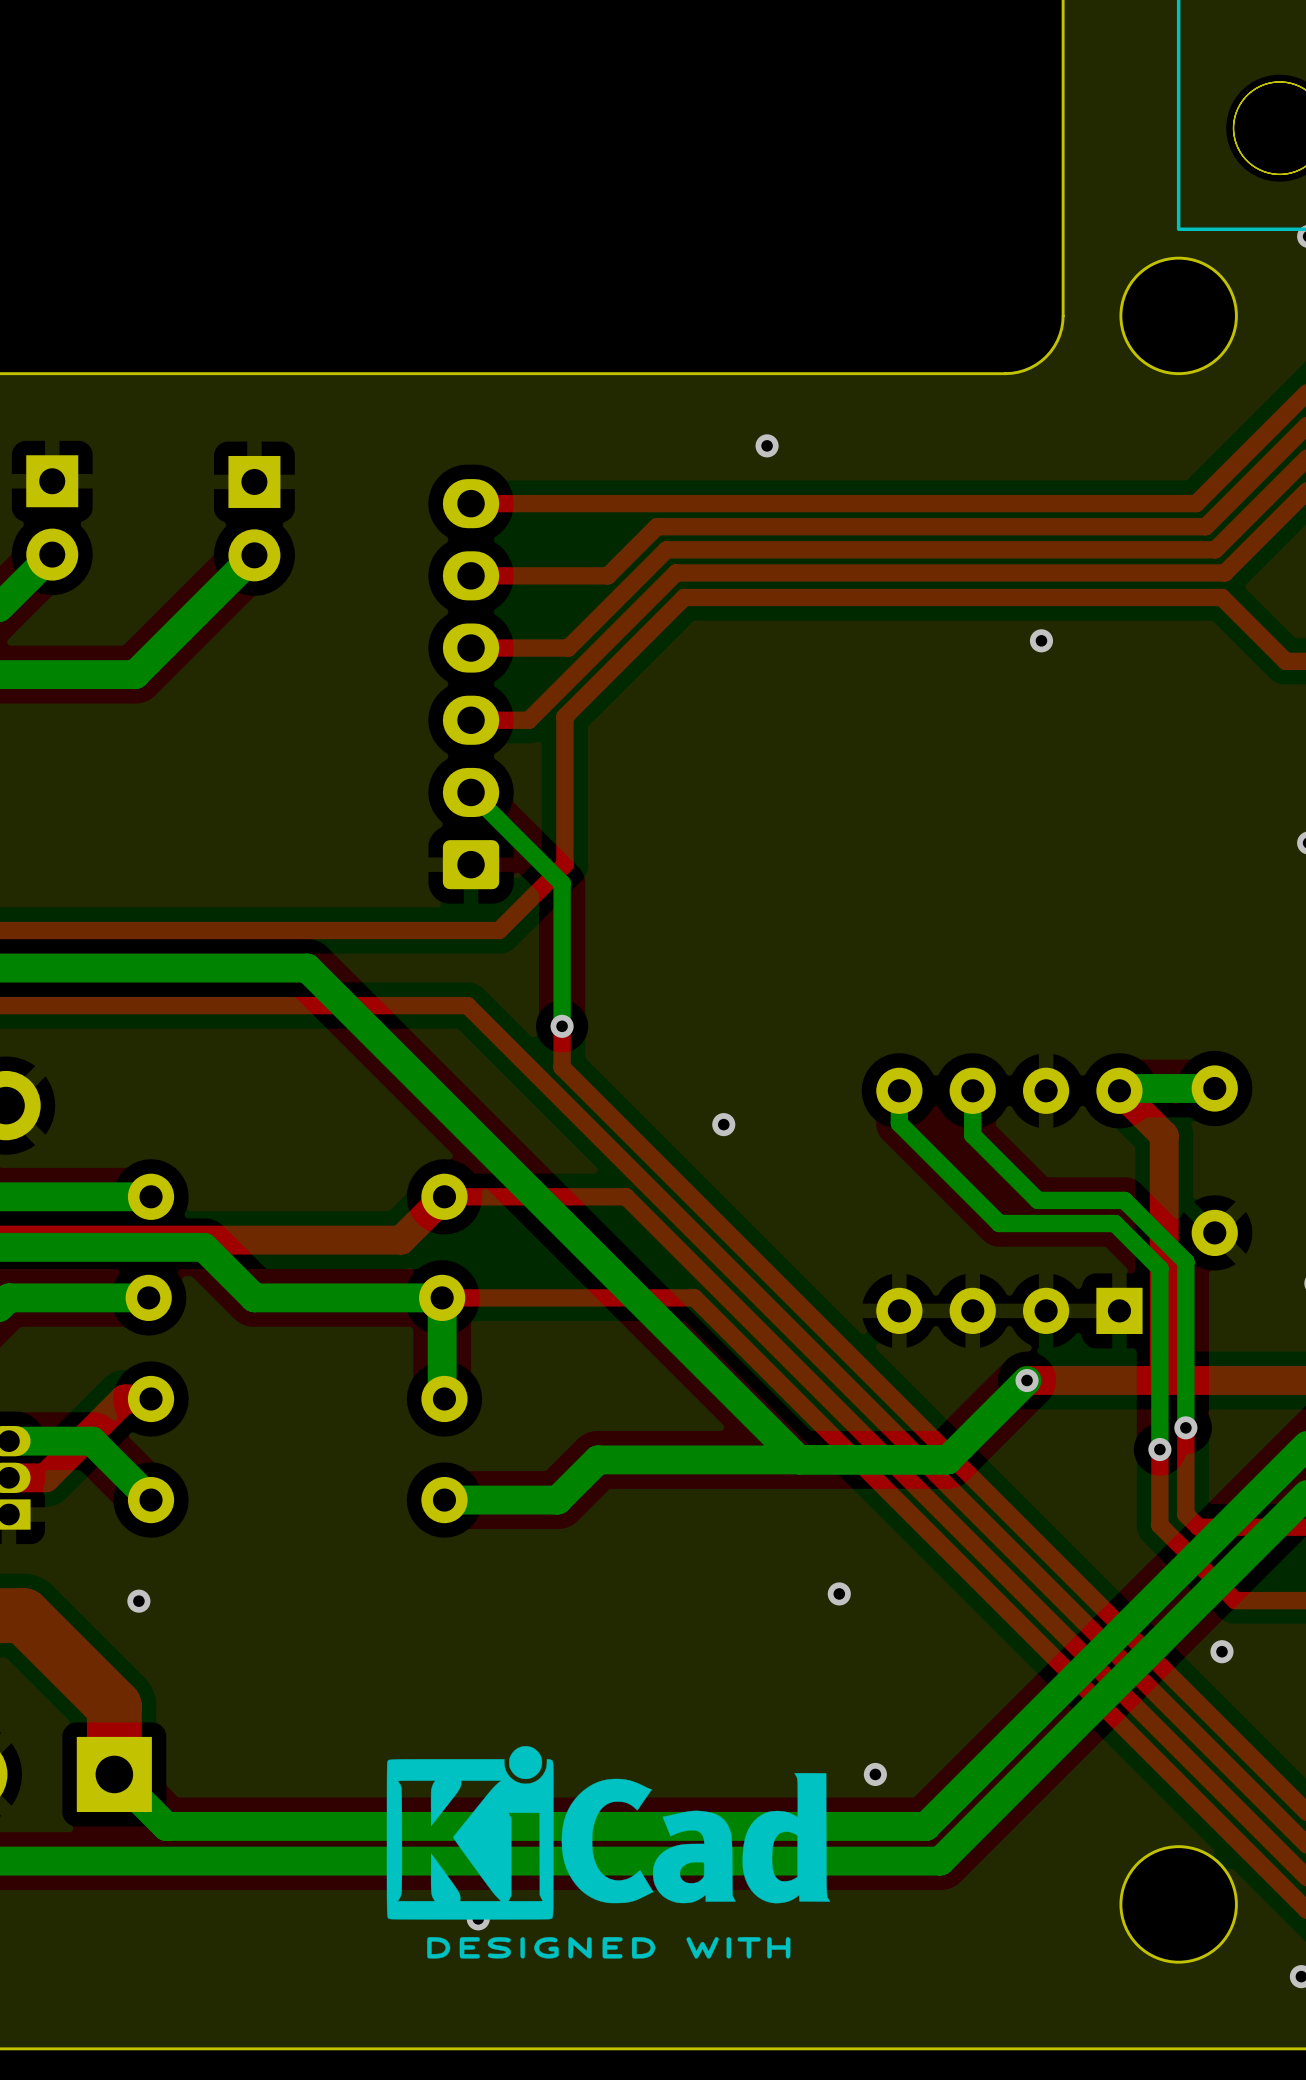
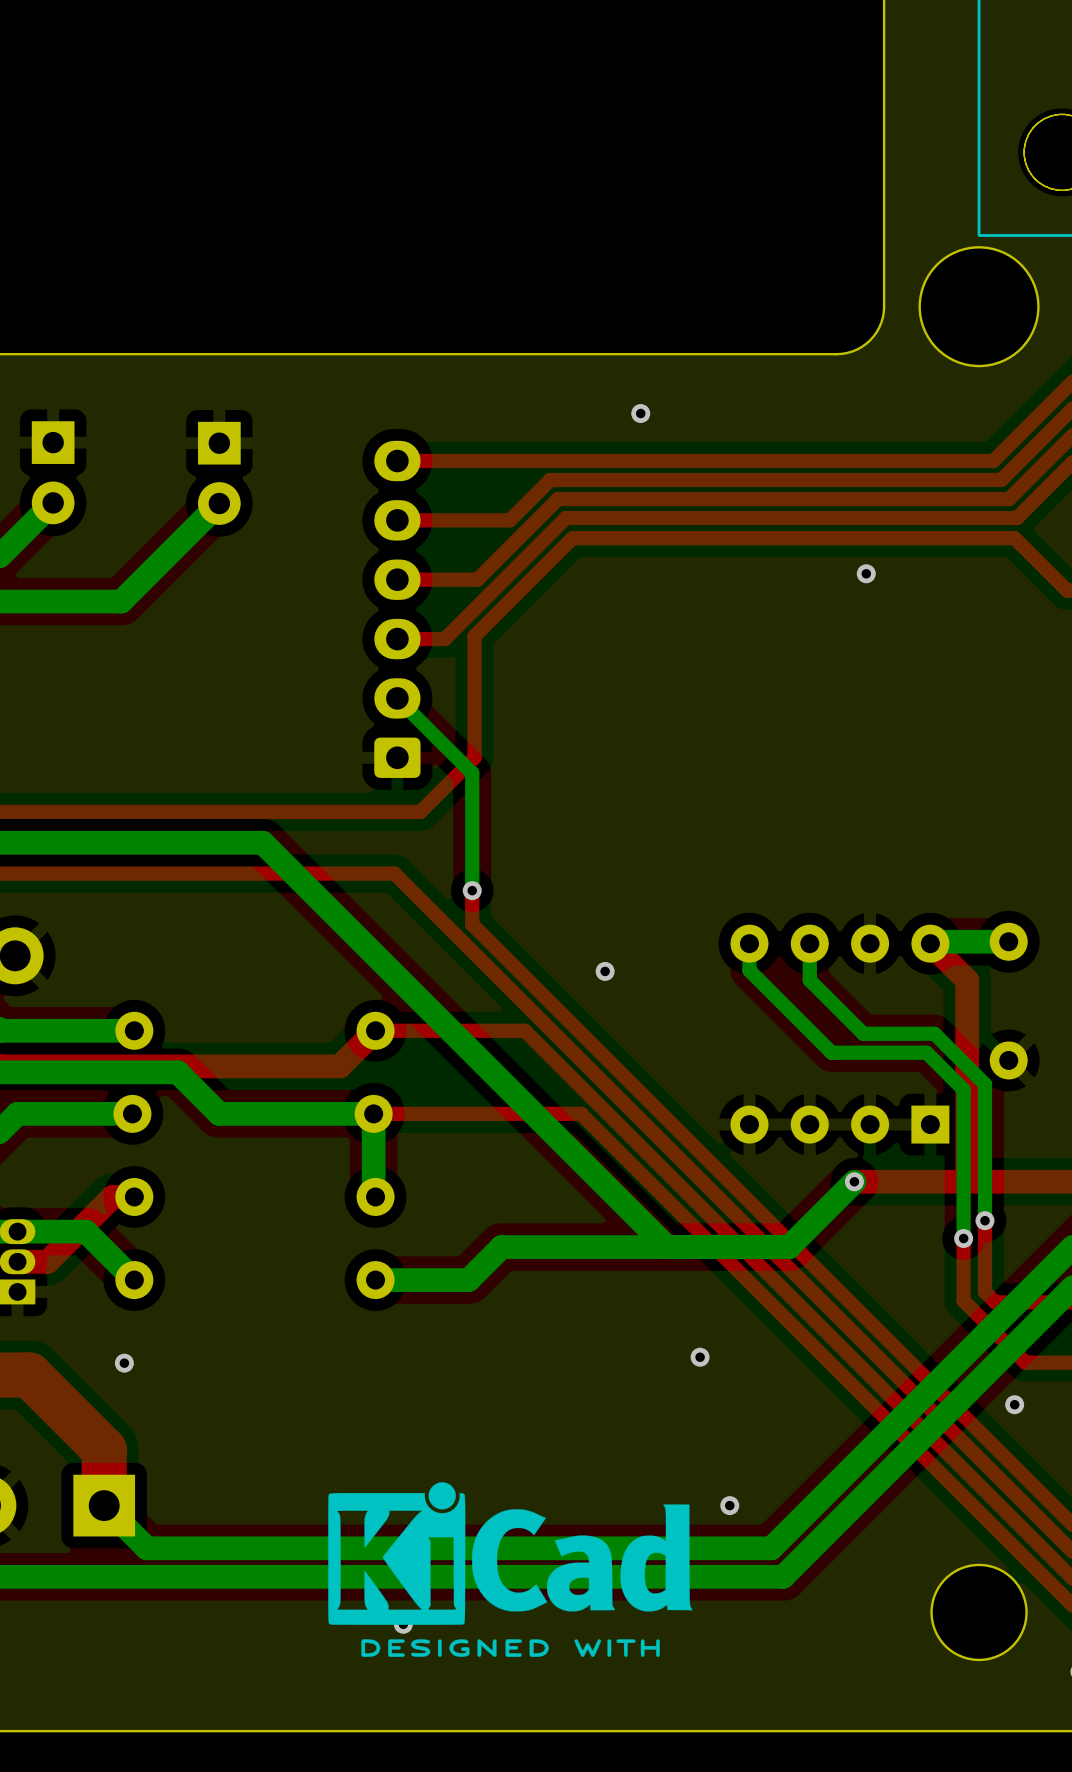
round board edge size: [1119, 256, 1238, 376] -> [918, 246, 1040, 368]

